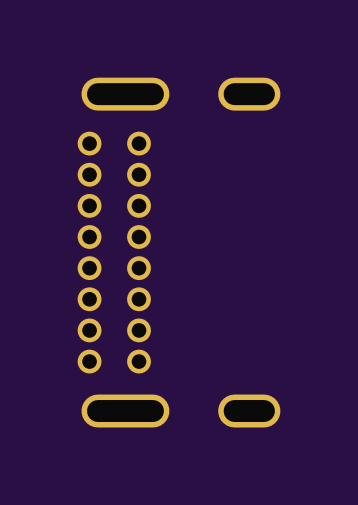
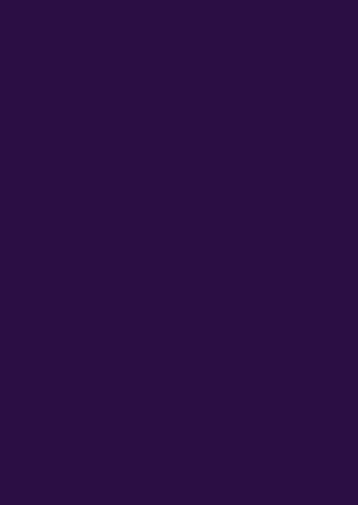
part: (179, 252) -> none

